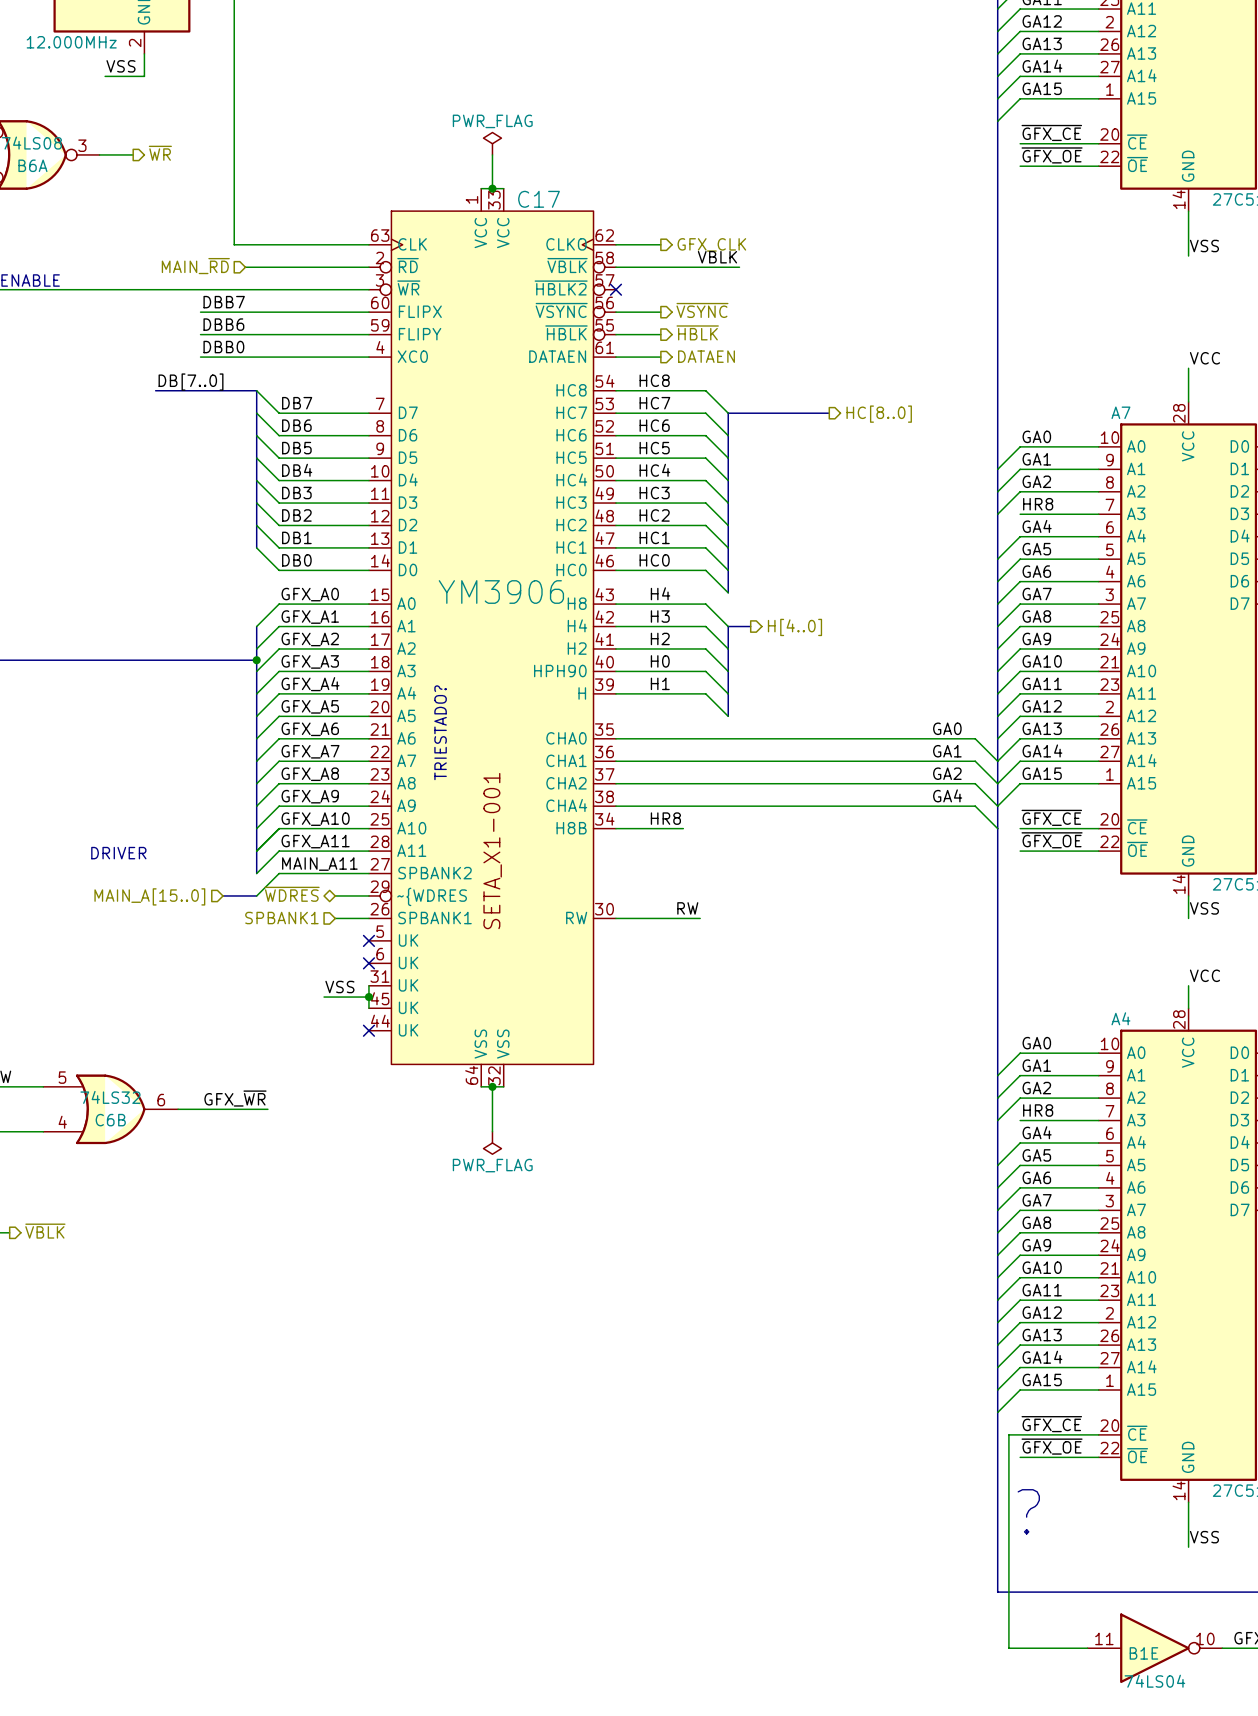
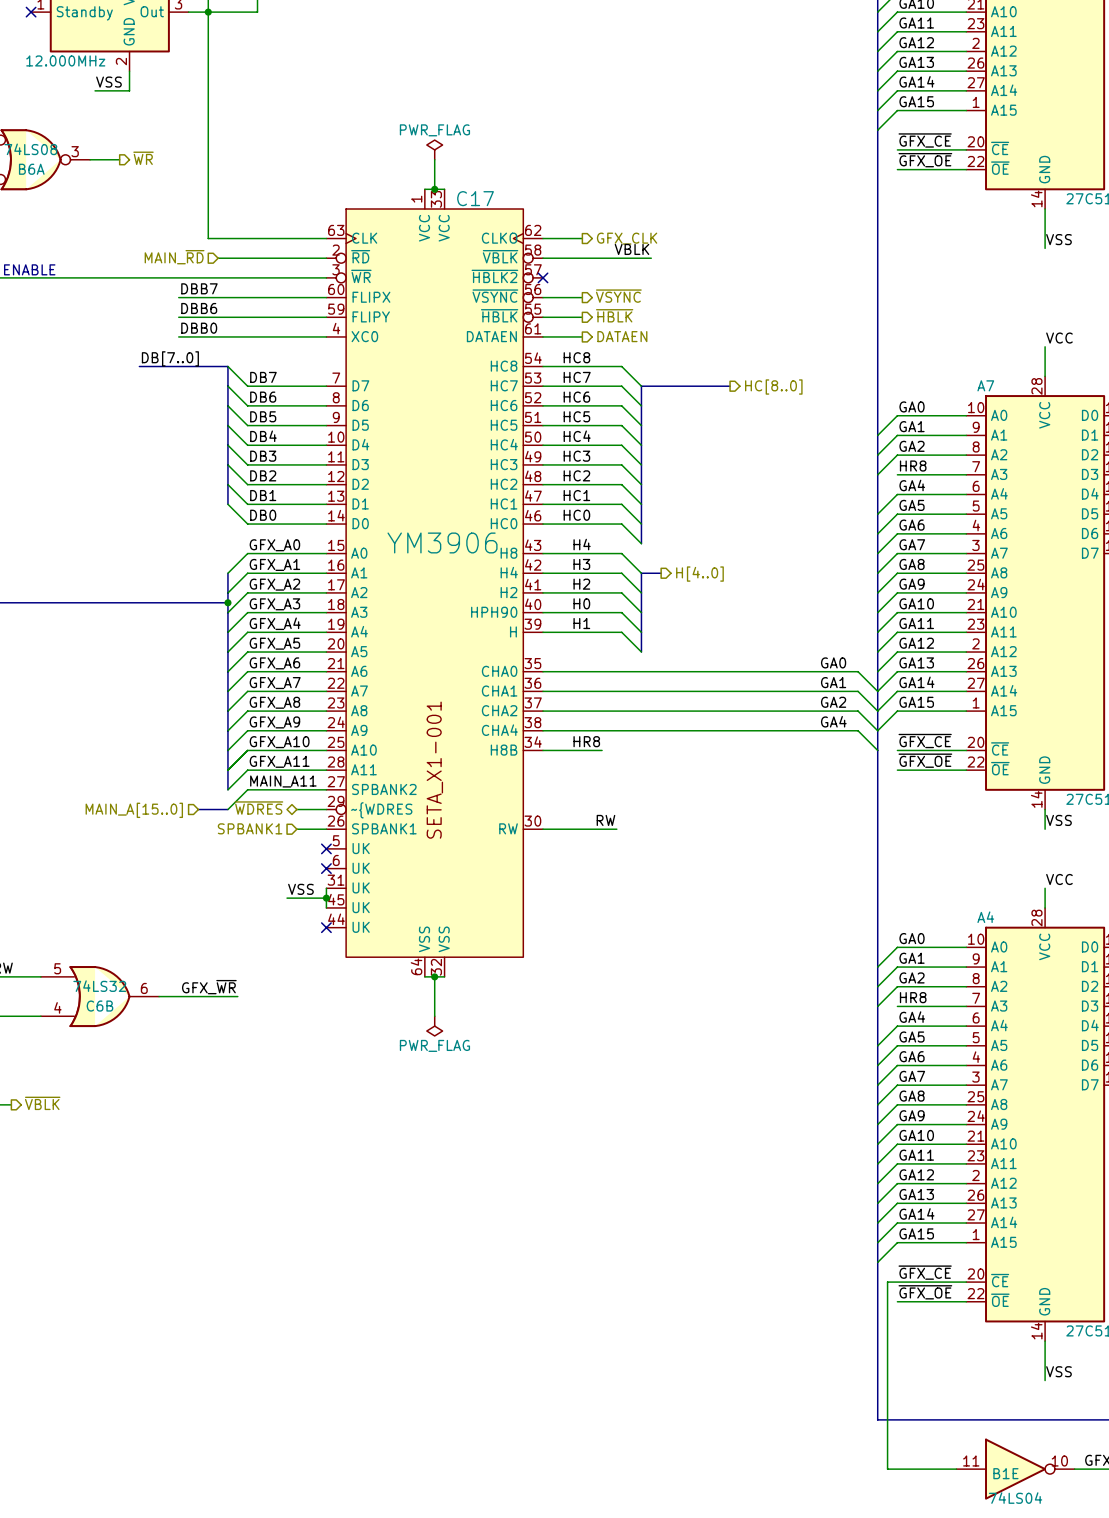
text: TRIESTADO? (440, 732) -> none
text: DRIVER (118, 853) -> none
text: ? (1028, 1511) -> none

